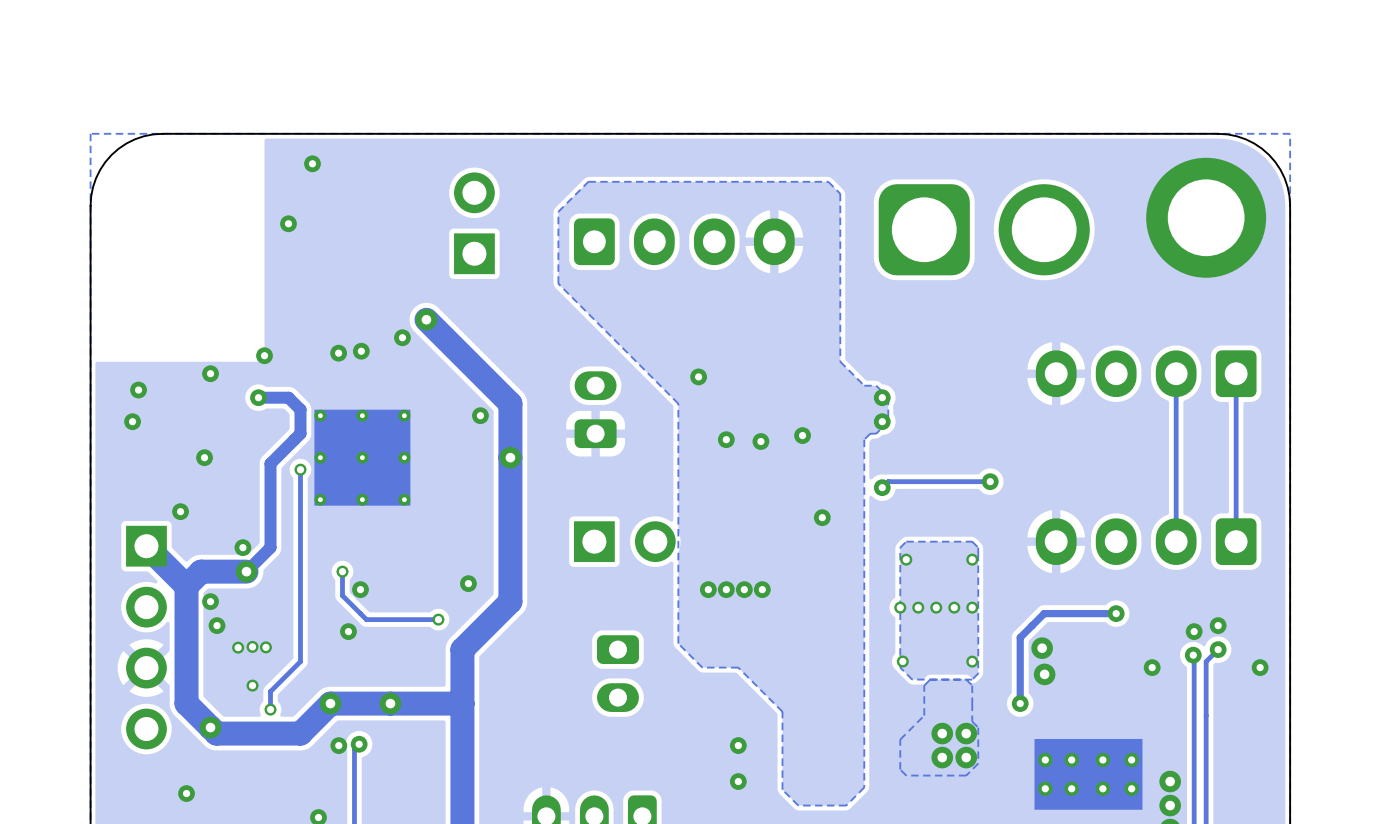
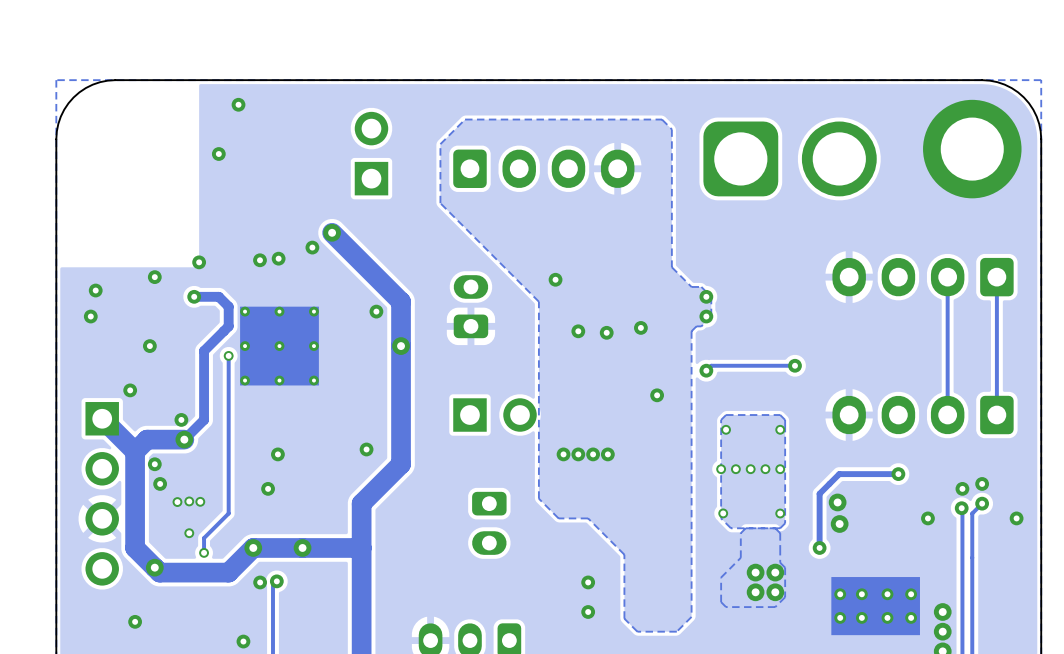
track: (342, 571) (342, 595) (366, 619) (438, 619) -> none
via: (342, 571) -> none
via: (438, 619) -> none

